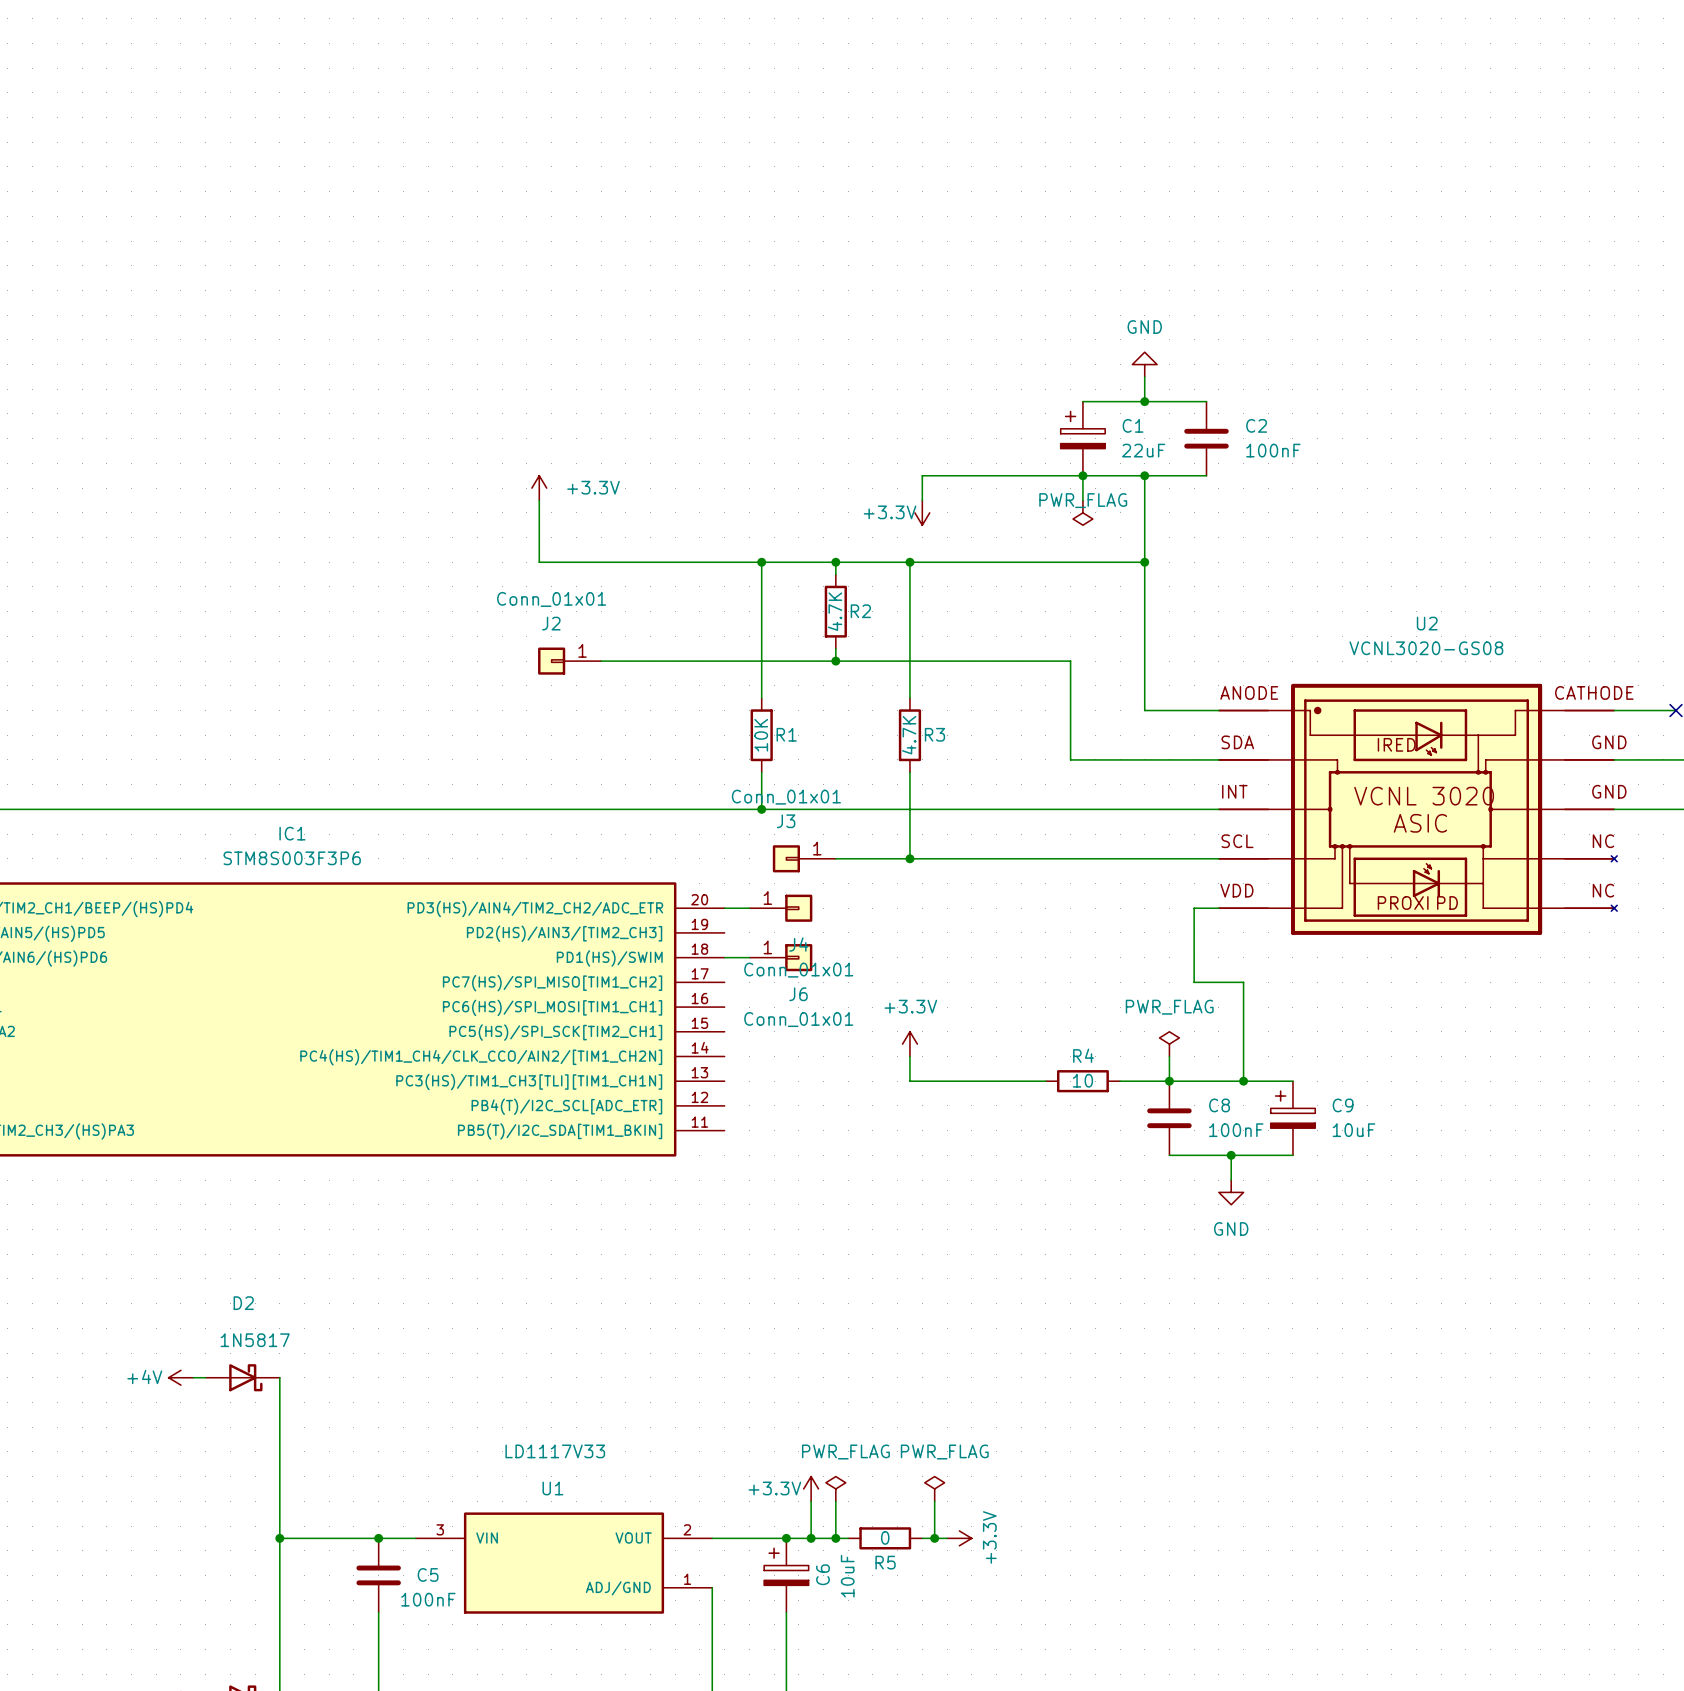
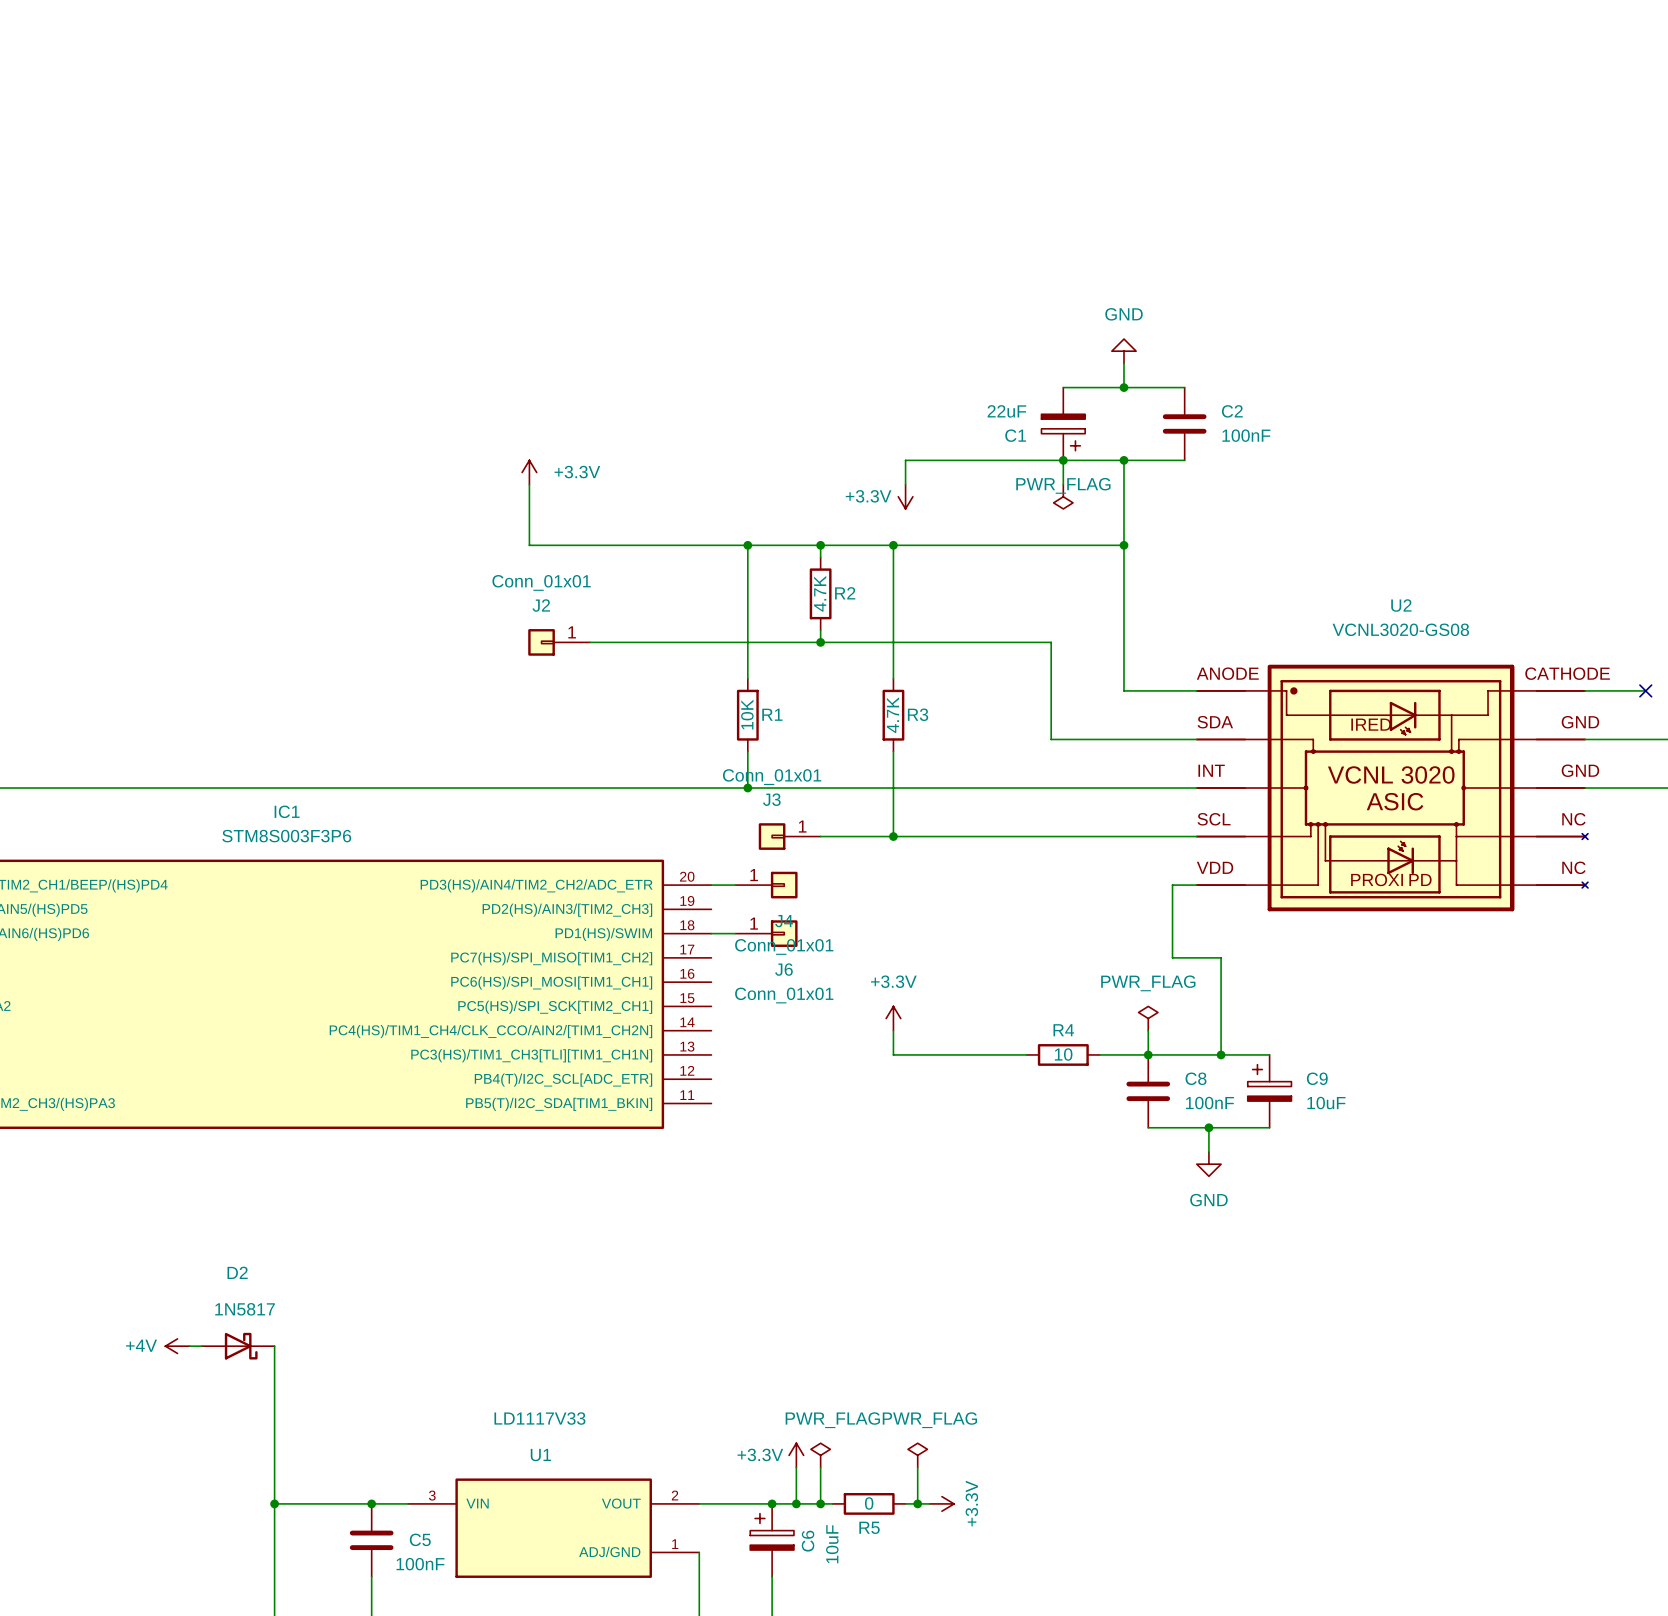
C1 rotation: 0° (1082, 430) -> 180° (1063, 432)

